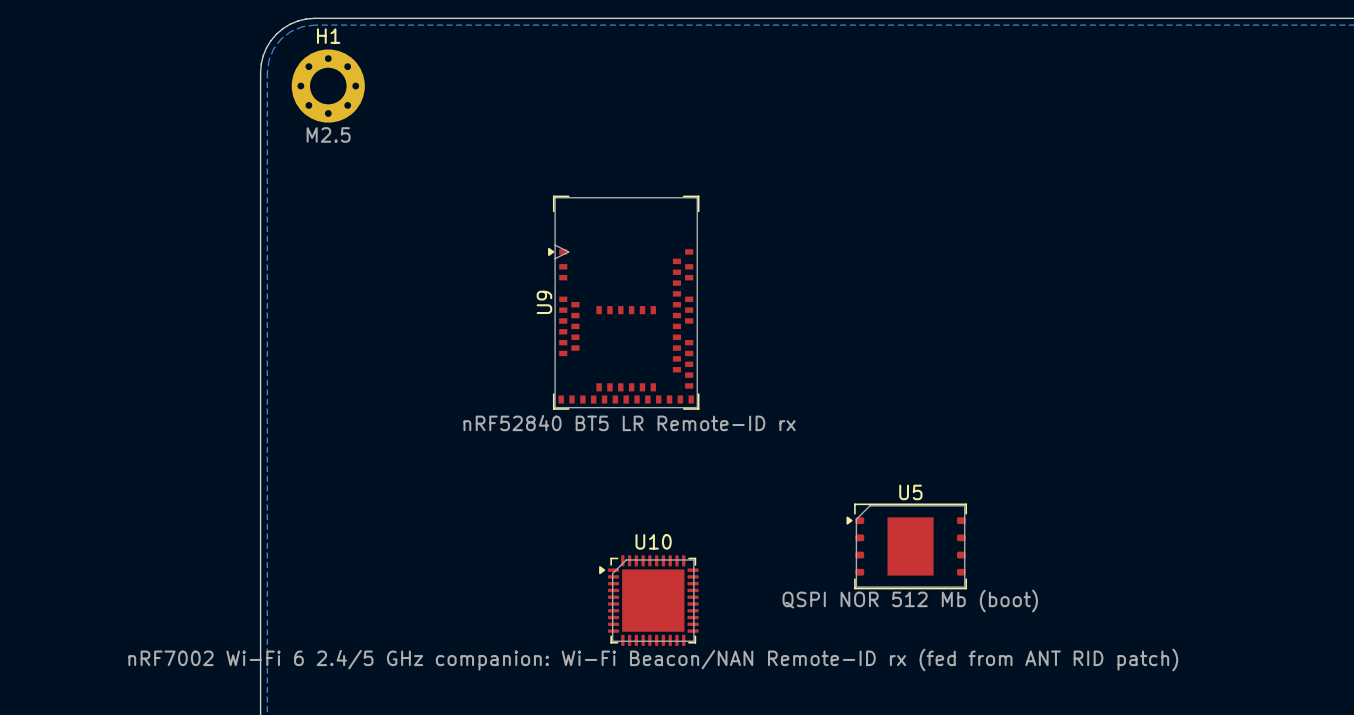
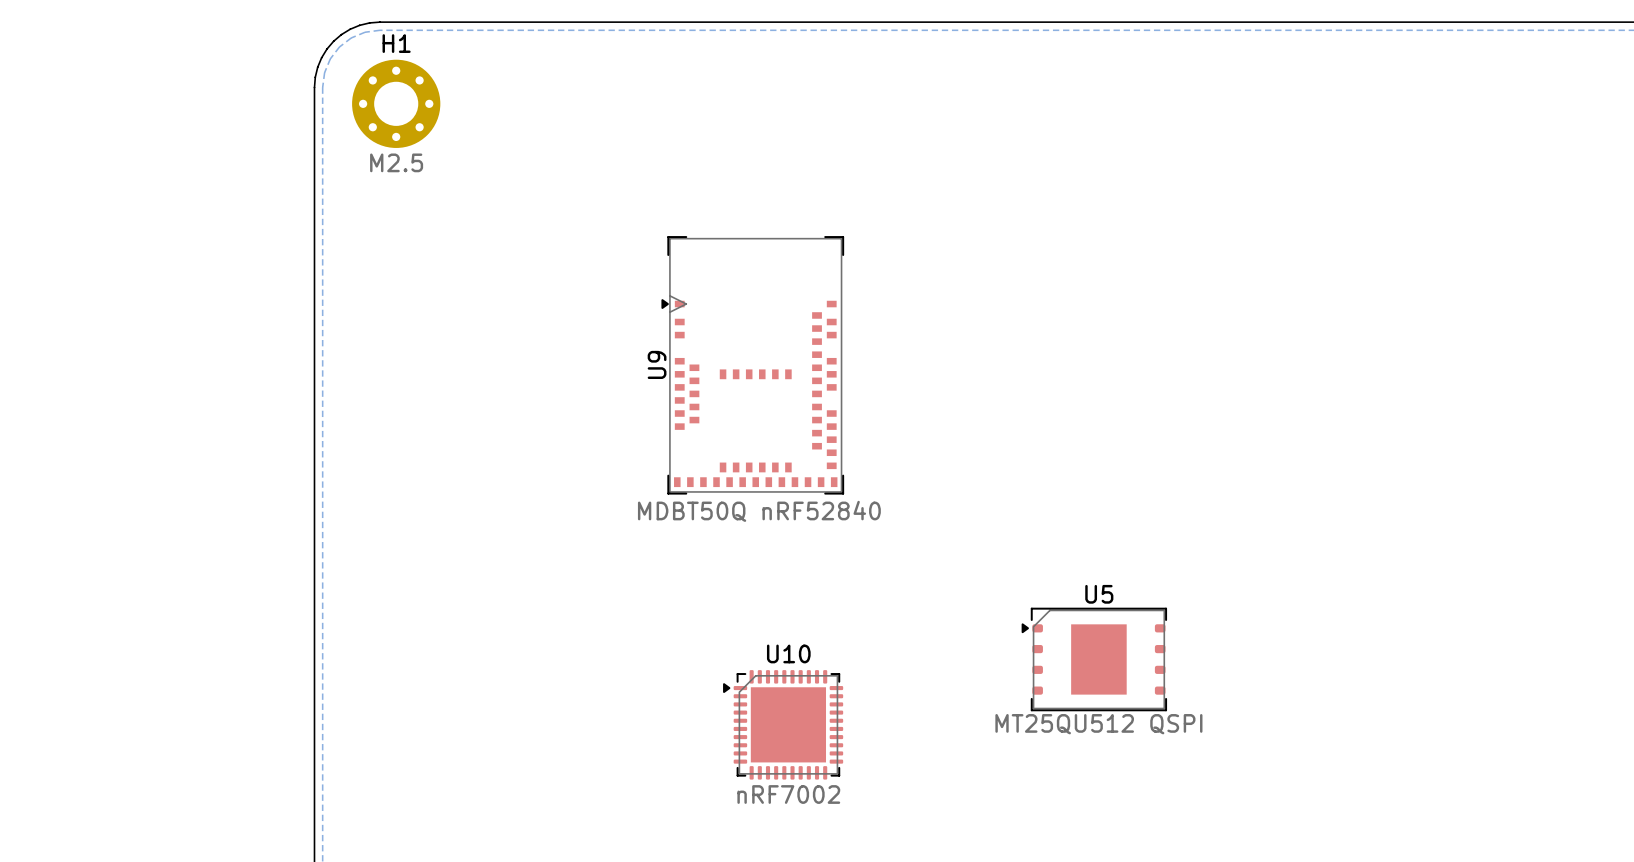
U9 value: nRF52840 BT5 LR Remote-ID rx (629, 423) -> MDBT50Q nRF52840 (759, 511)
U5 value: QSPI NOR 512 Mb (boot) (910, 601) -> MT25QU512 QSPI (1098, 724)
U10 value: nRF7002 Wi-Fi 6 2.4/5 GHz companion: Wi-Fi Beacon/NAN Remote-ID rx (fed from ANT RID patch) (653, 659) -> nRF7002 (788, 794)

